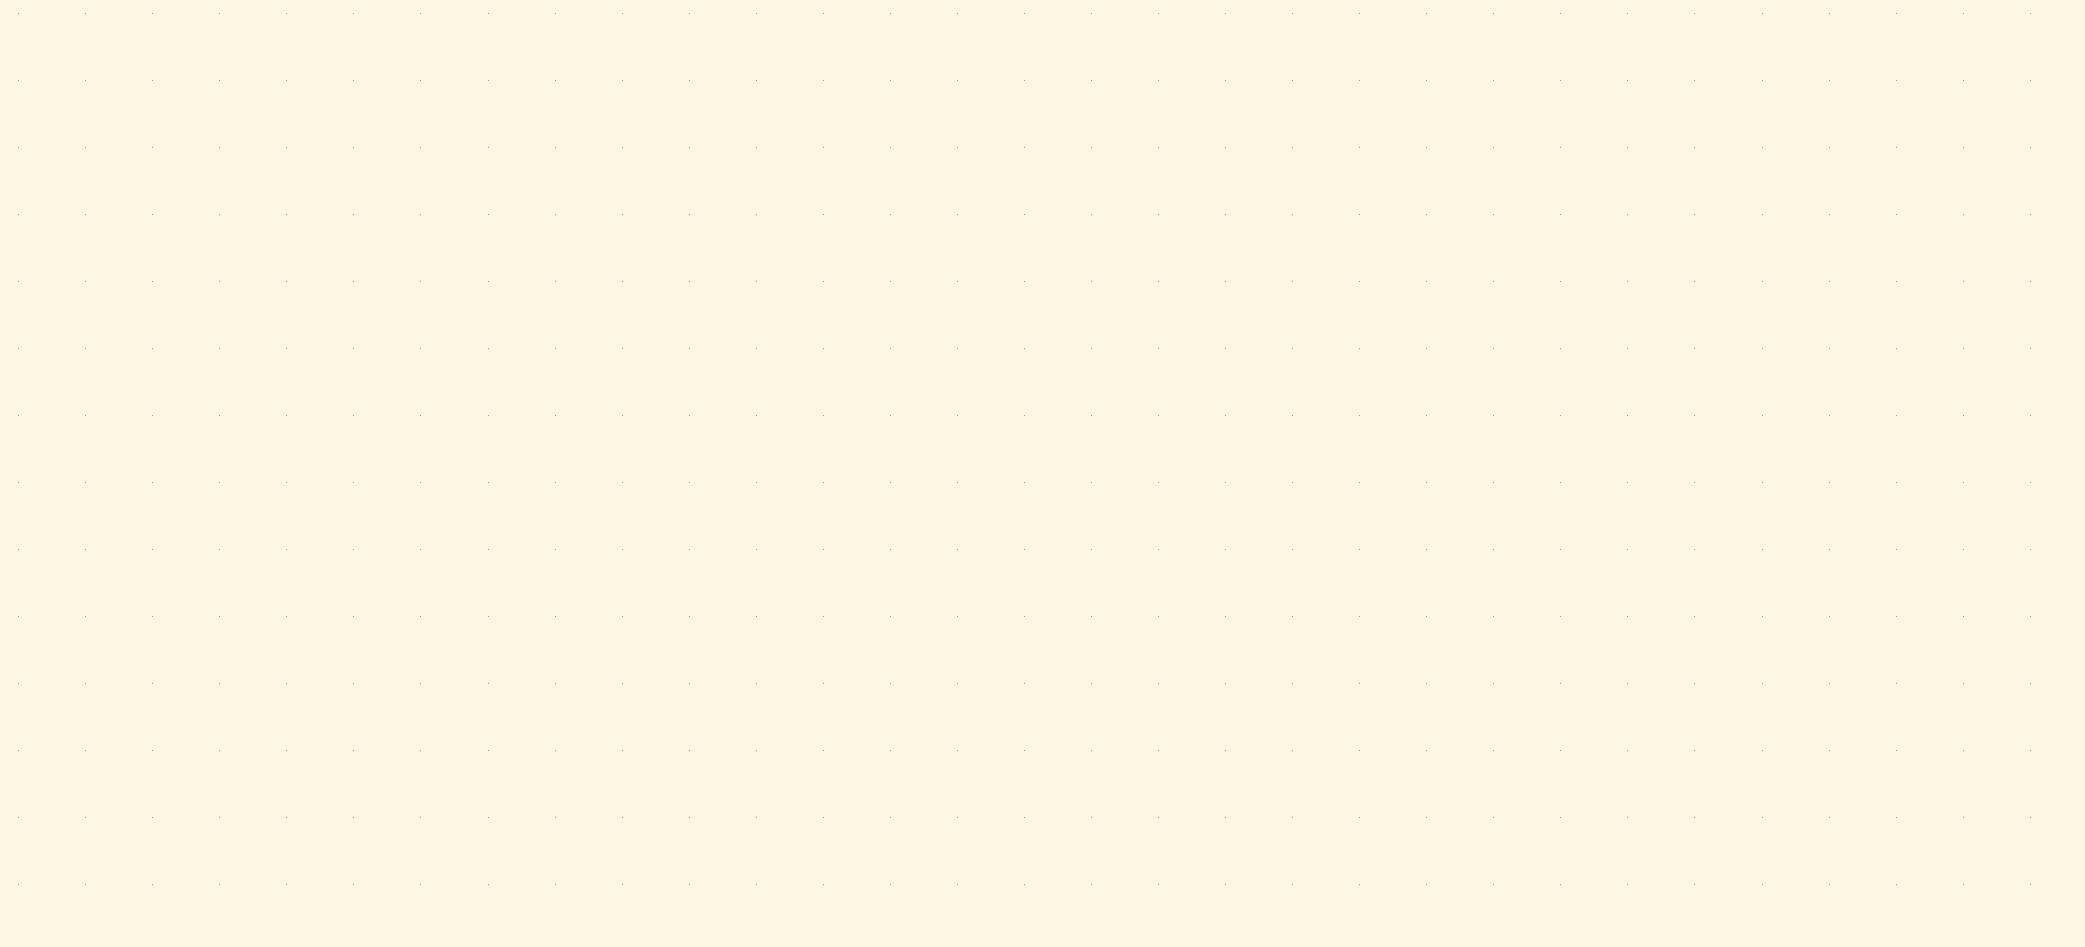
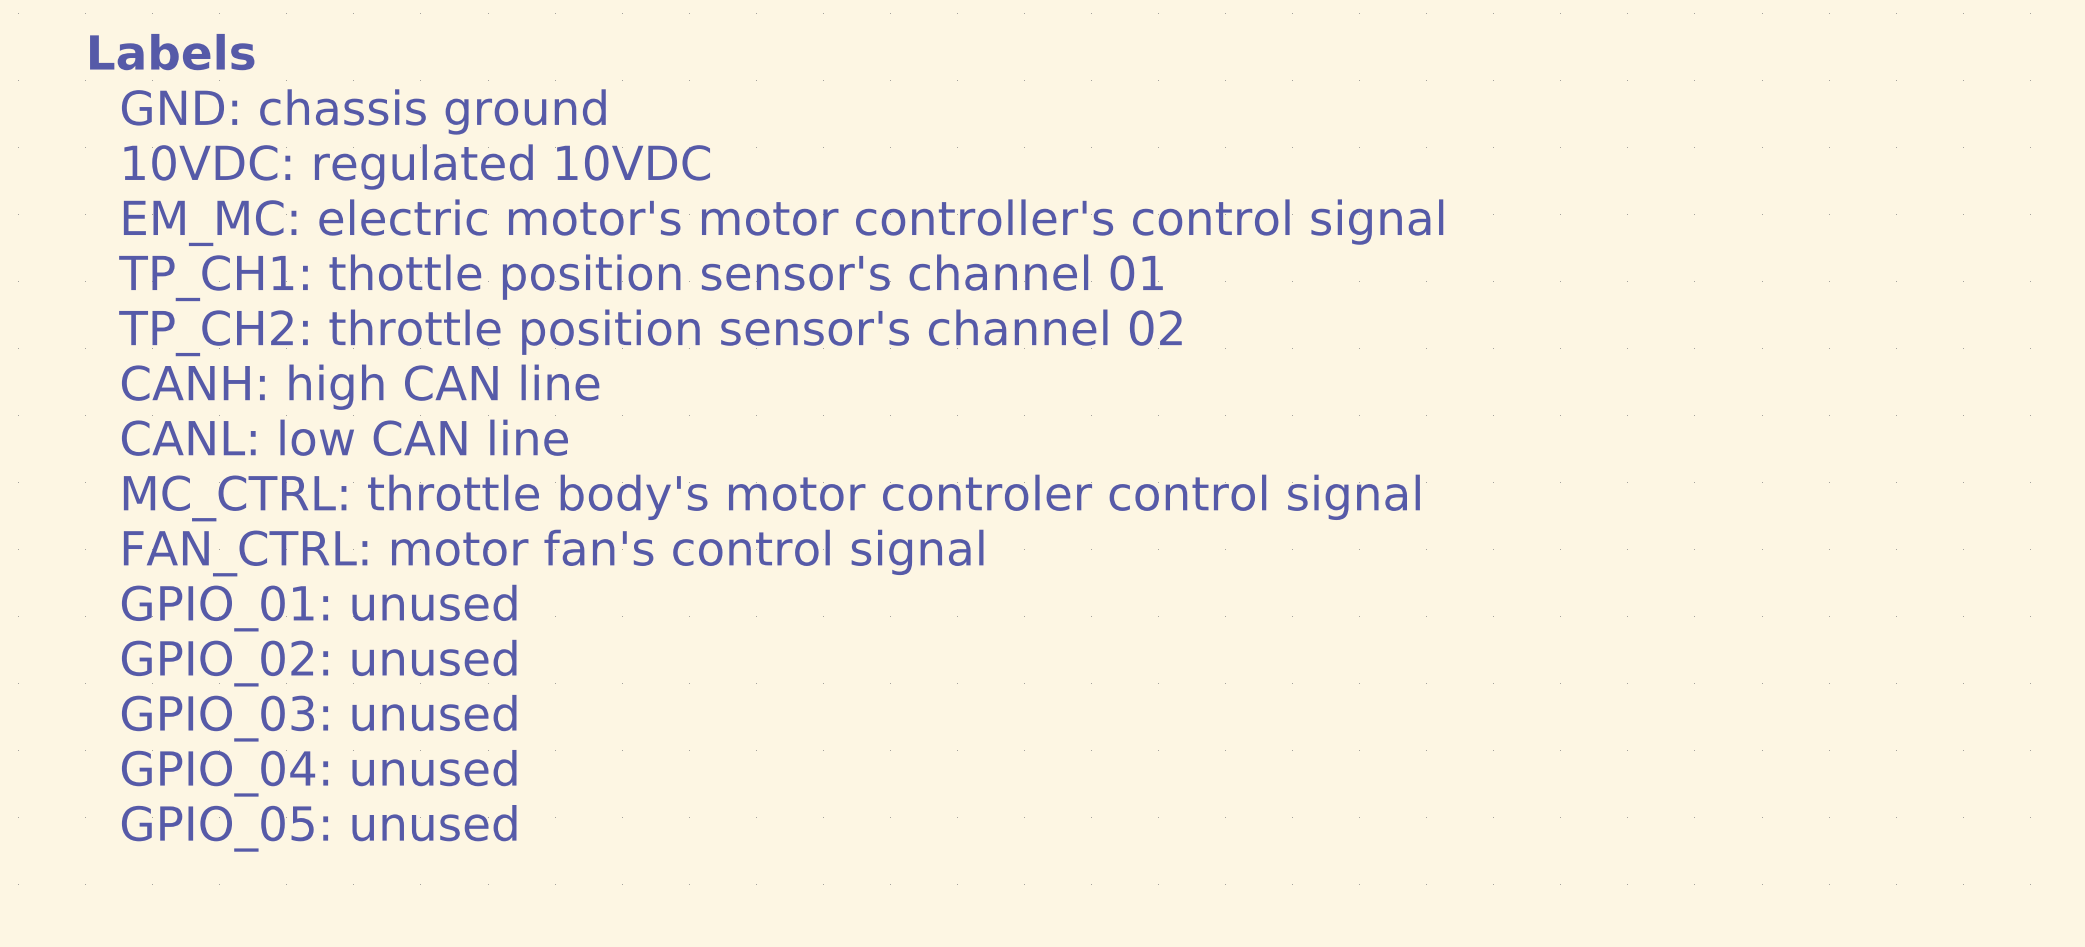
text: none -> Labels (172, 52)
text: none -> GND: chassis ground (363, 111)
text: none -> 10VDC: regulated 10VDC (417, 167)
text: none -> EM_MC: electric motor's motor controller's control signal (783, 222)
text: none -> TP_CH1: thottle position sensor's channel 01 (640, 277)
text: none -> TP_CH2: throttle position sensor's channel 02 (650, 332)
text: none -> CANH: high CAN line (360, 387)
text: none -> CANL: low CAN line (344, 437)
text: none -> MC_CTRL: throttle body's motor controler control signal (771, 498)
text: none -> FAN_CTRL: motor fan's control signal (553, 553)
text: none -> GPIO_01: unused (319, 608)
text: none -> GPIO_02: unused (319, 663)
text: none -> GPIO_03: unused (319, 718)
text: none -> GPIO_04: unused (319, 773)
text: none -> GPIO_05: unused (319, 828)

